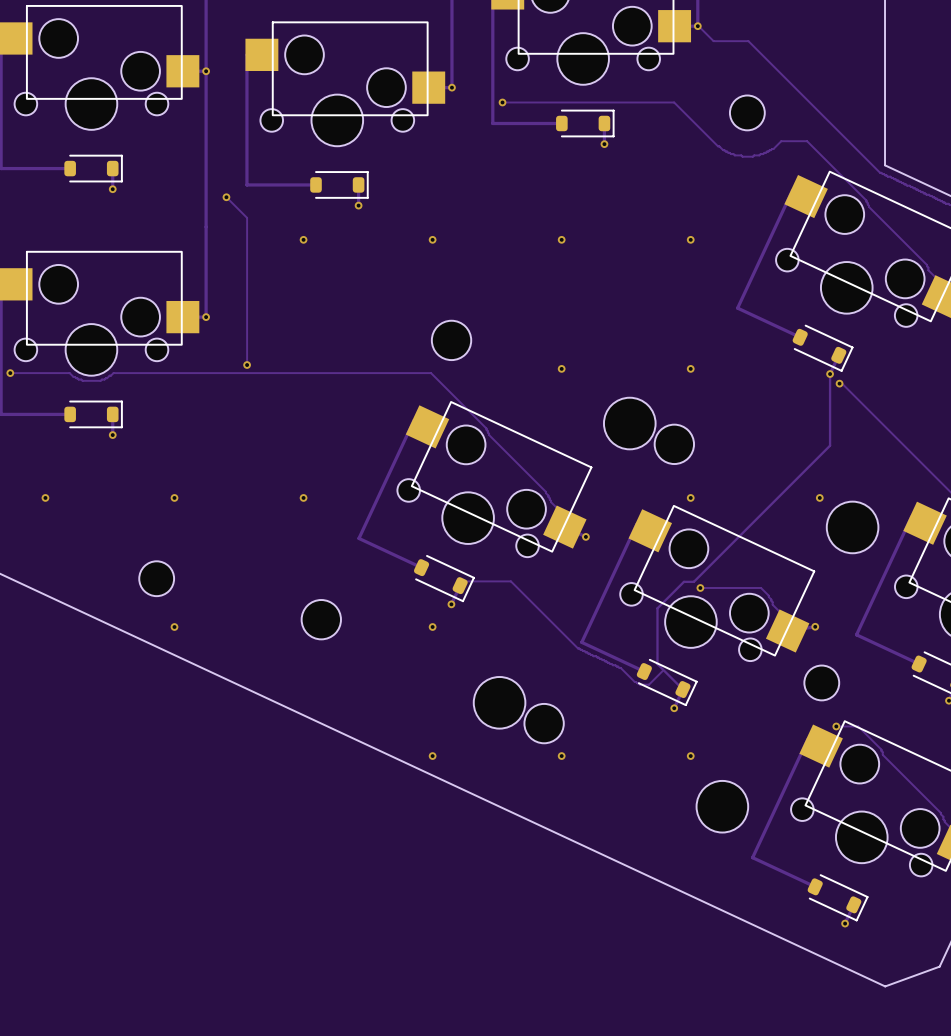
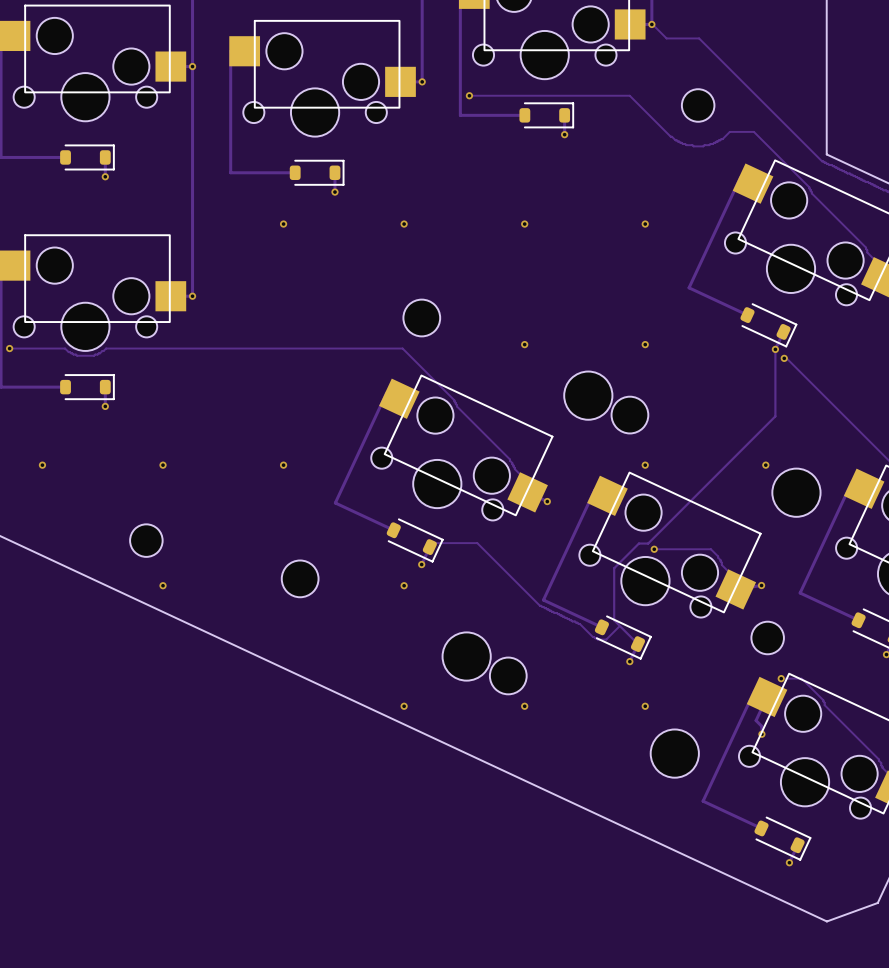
track: (226, 197) (247, 217) (247, 365) -> none
via: (226, 197) -> none
via: (247, 365) -> none
track: none -> (767, 696) (756, 720) (761, 726) (761, 734)
via: none -> (761, 734)

